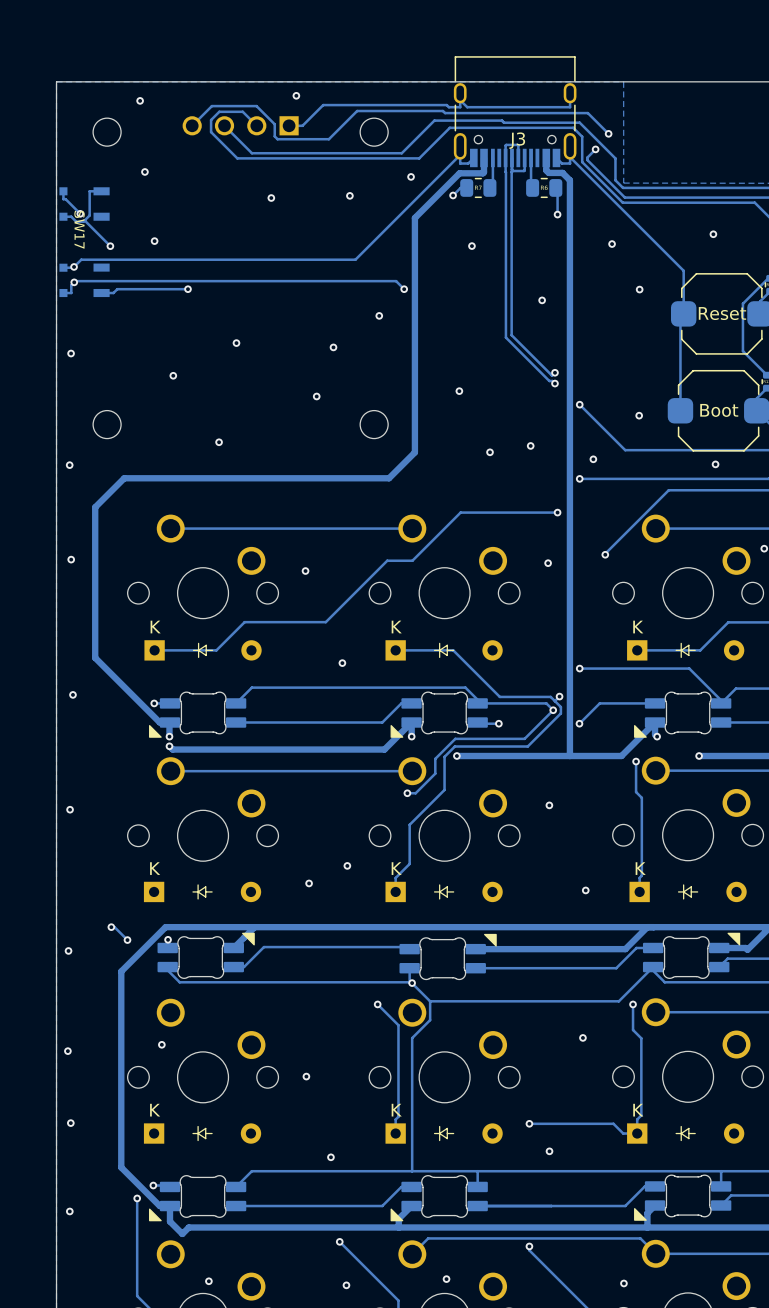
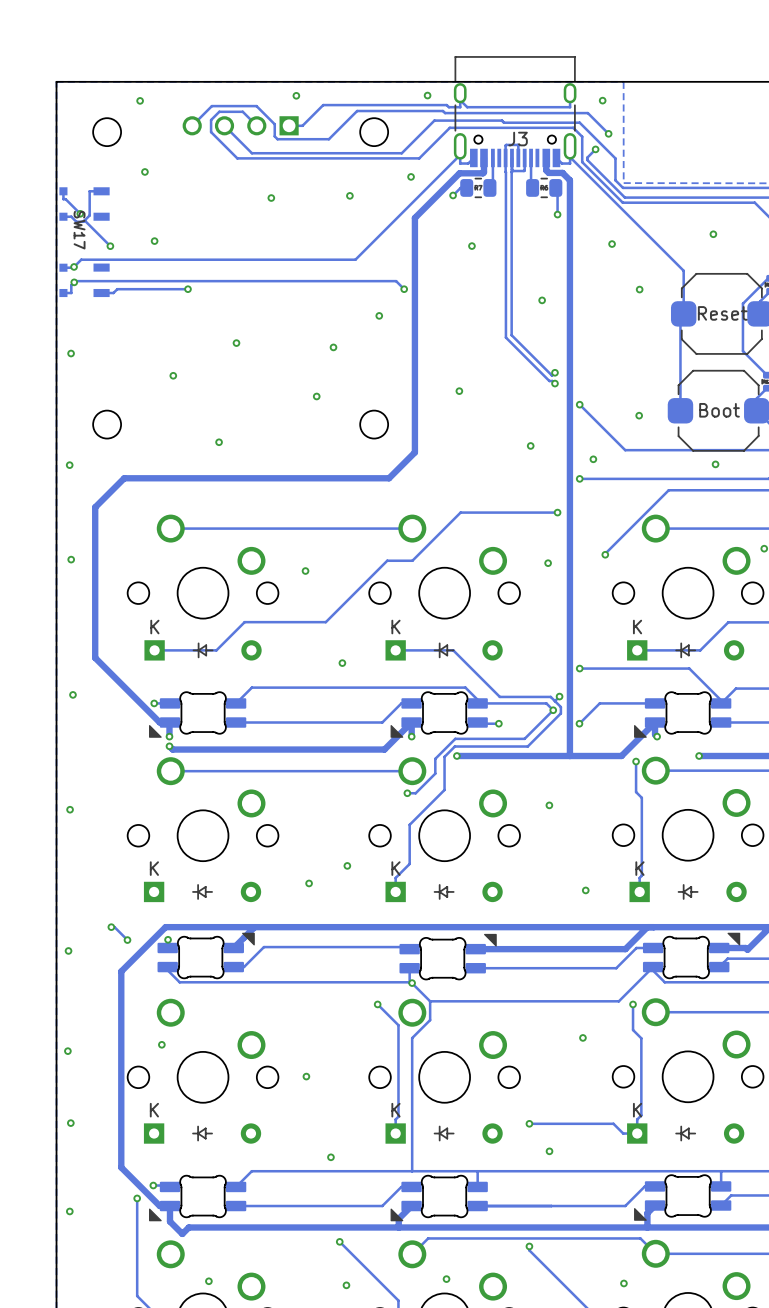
via: none -> (427, 95)
via: none -> (602, 100)
via: (490, 452) -> none

